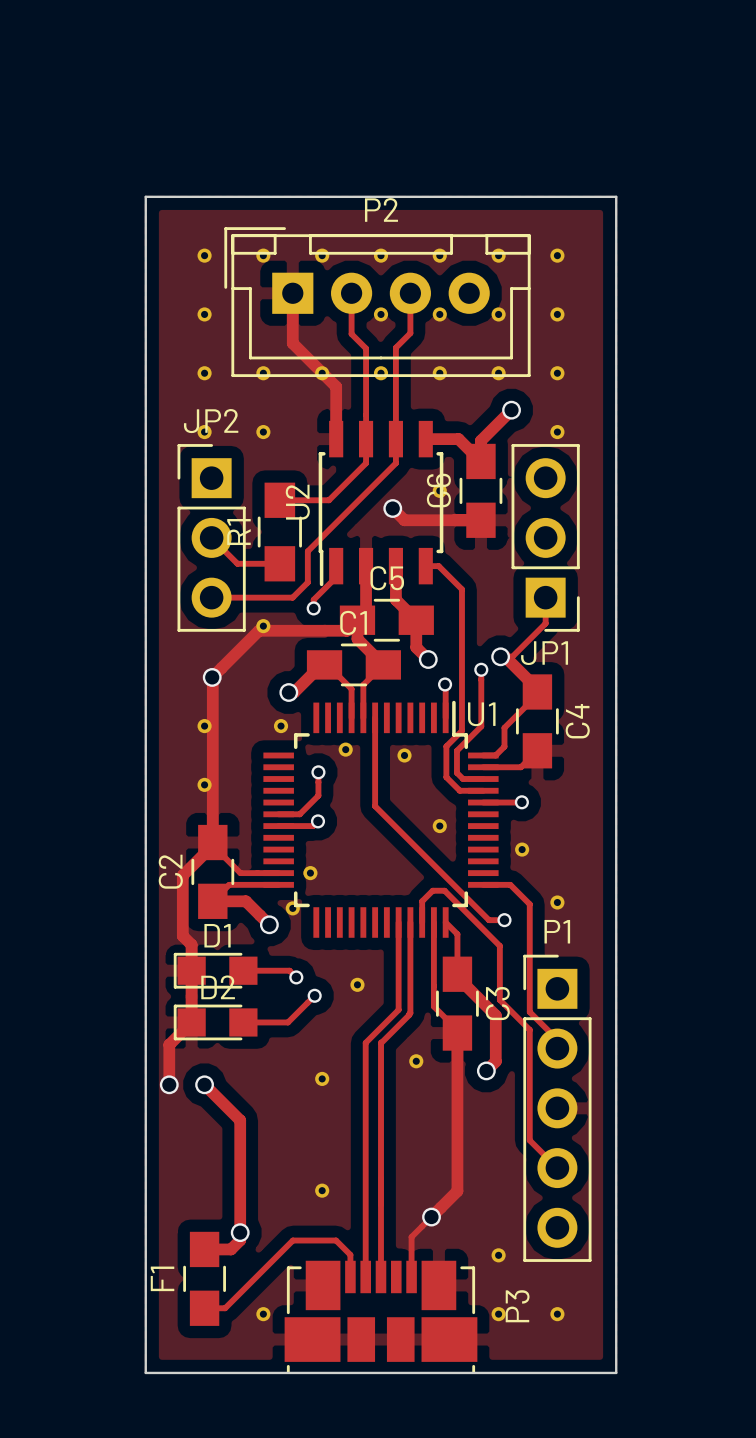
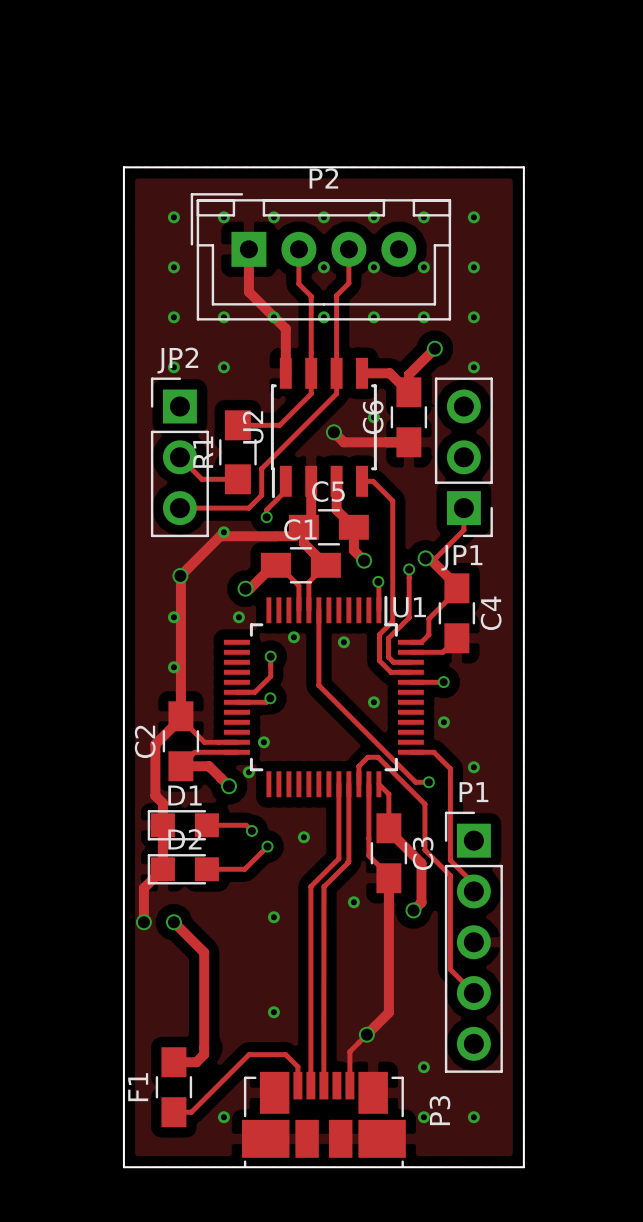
via: (240, 1232) -> none

